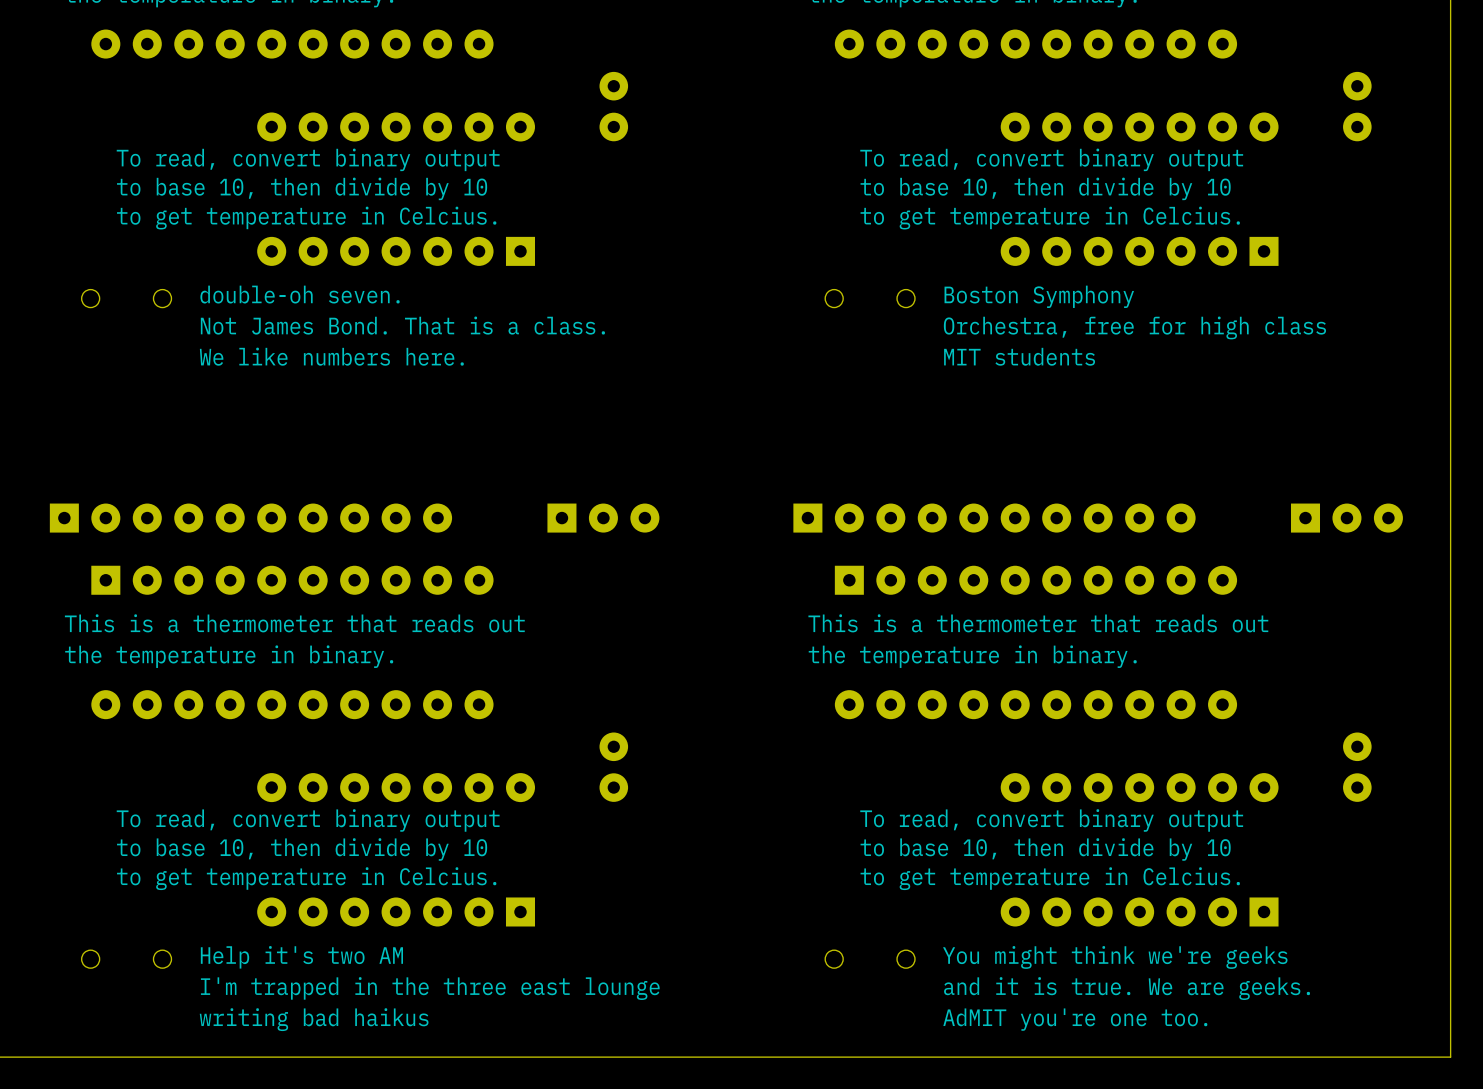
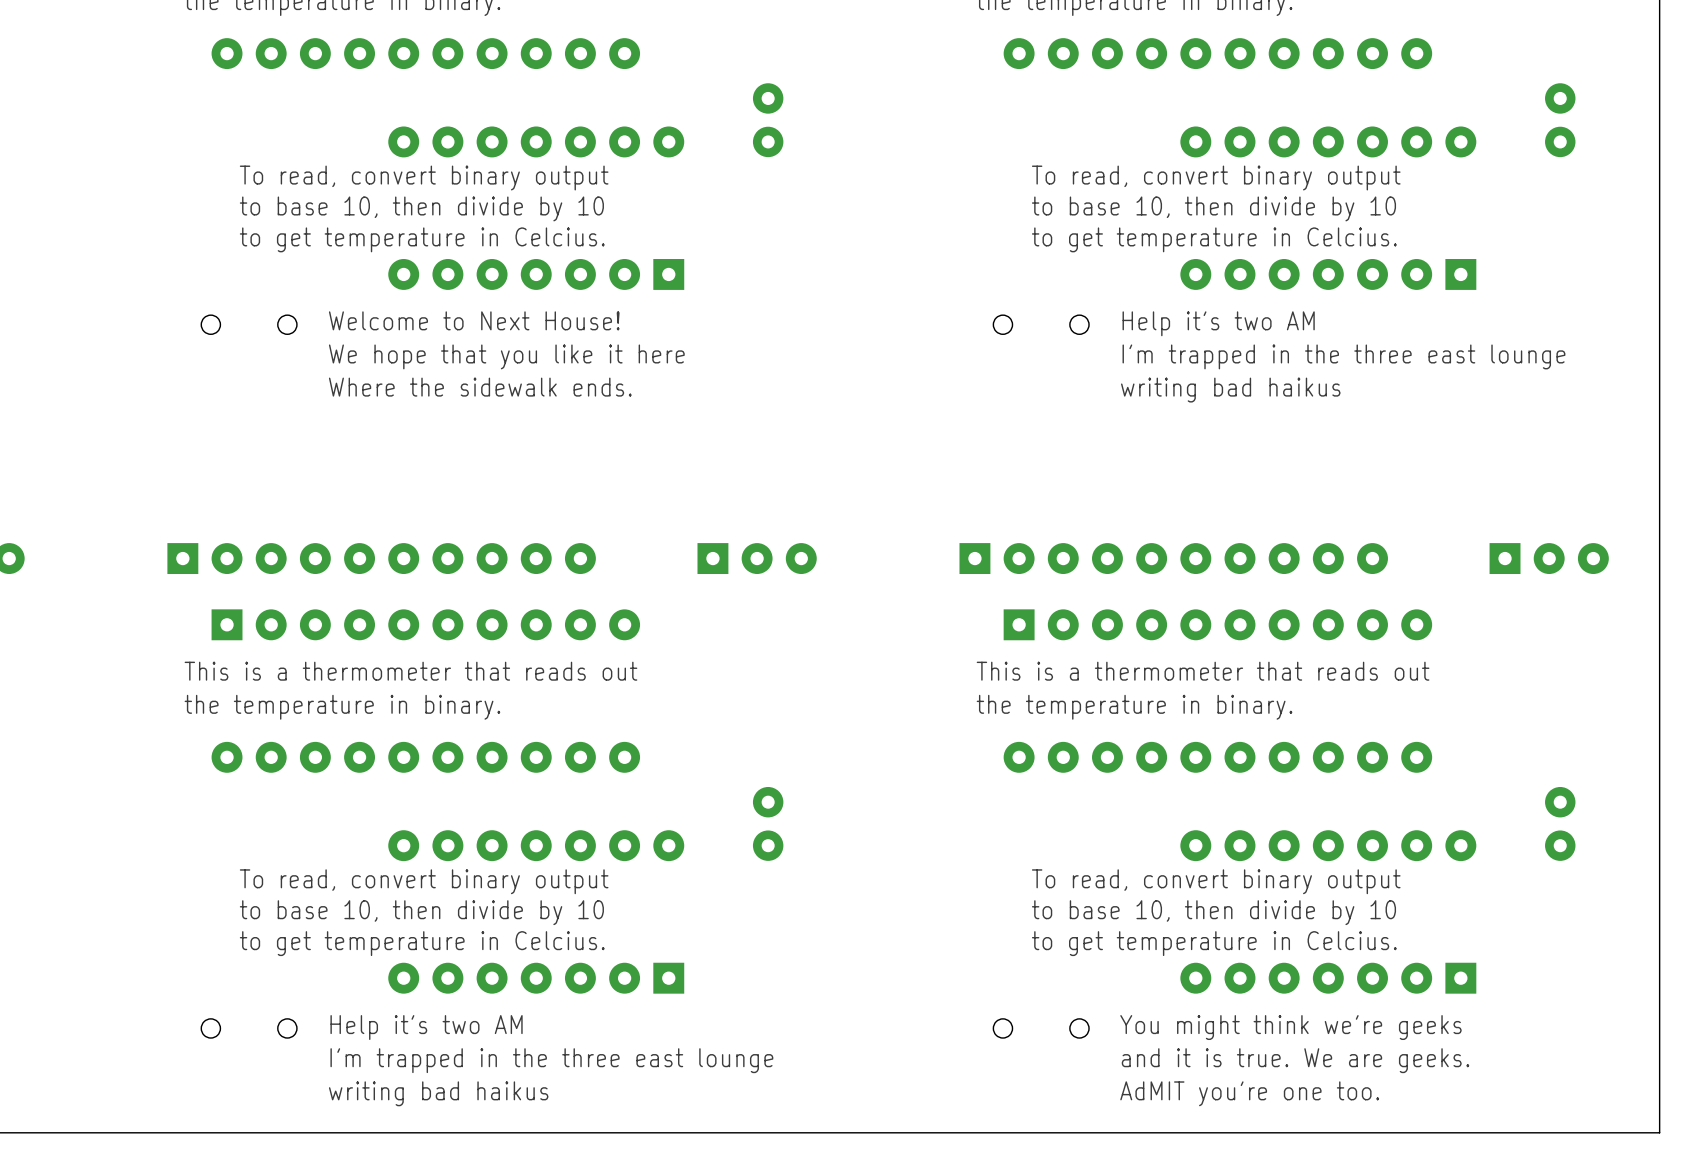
text: double-oh seven. (300, 294) -> Welcome to Next House! (474, 320)
text: Boston Symphony (1039, 296) -> Help it's two AM (1218, 323)
text: Not James Bond. That is a class. (402, 325) -> We hope that you like it here (506, 356)
text: Orchestra, free for high class (1134, 327) -> I'm trapped in the three east lounge (1343, 356)
text: We like numbers here. (331, 356) -> Where the sidewalk ends. (480, 387)
text: MIT students (1019, 356) -> writing bad haikus (1230, 390)

